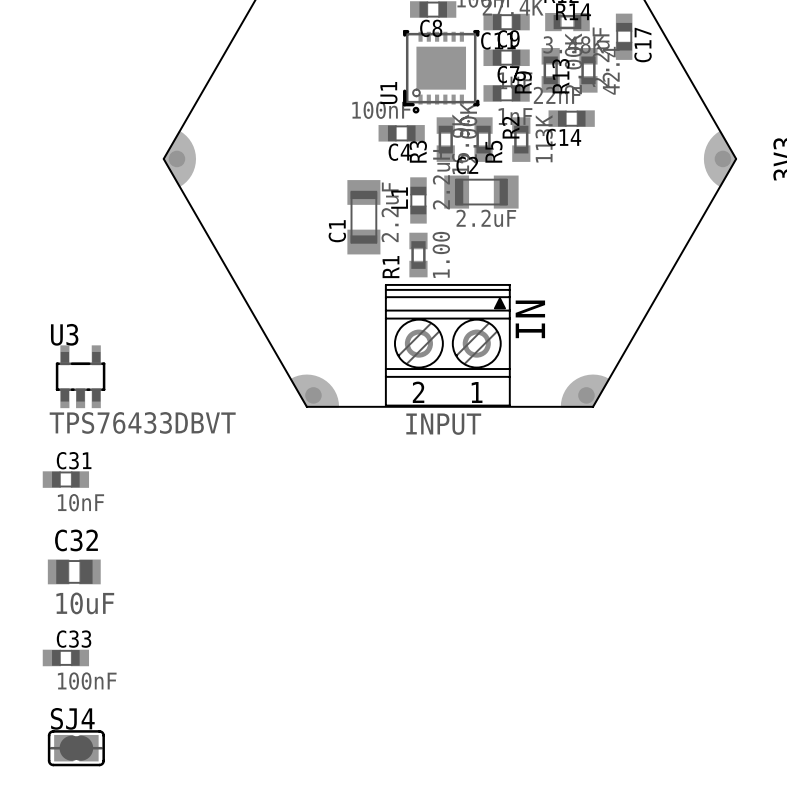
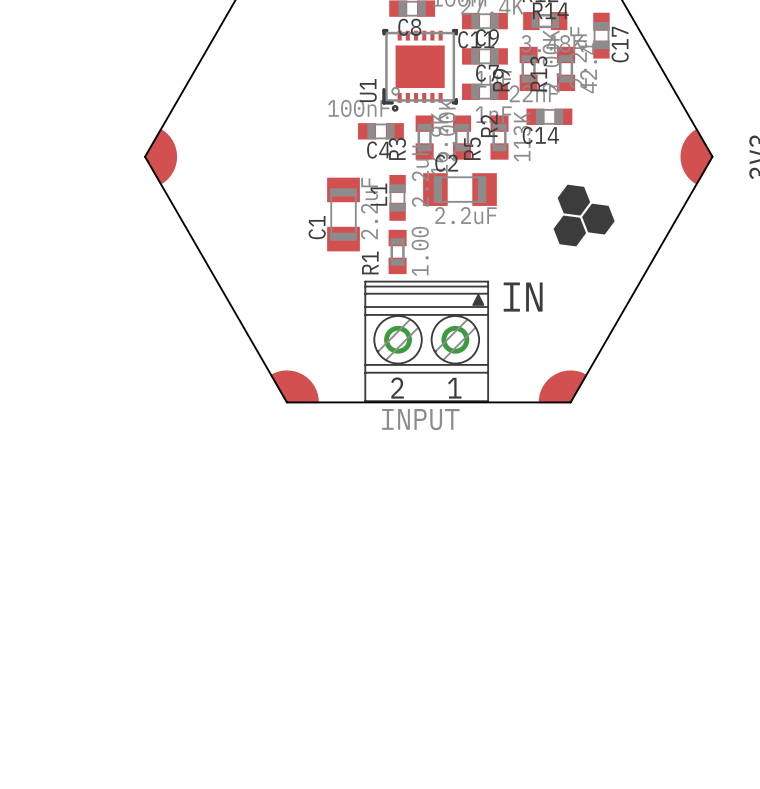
drawing: none -> [553, 184, 615, 247]
IN name rotation: 0° (530, 319) -> 90° clockwise (523, 297)
U3: TPS76433DBVT (80, 376) -> none
C31: 10nF (65, 479) -> none
C32: 10uF (74, 571) -> none
C33: 100nF (65, 657) -> none
SJ4: (76, 748) -> none

